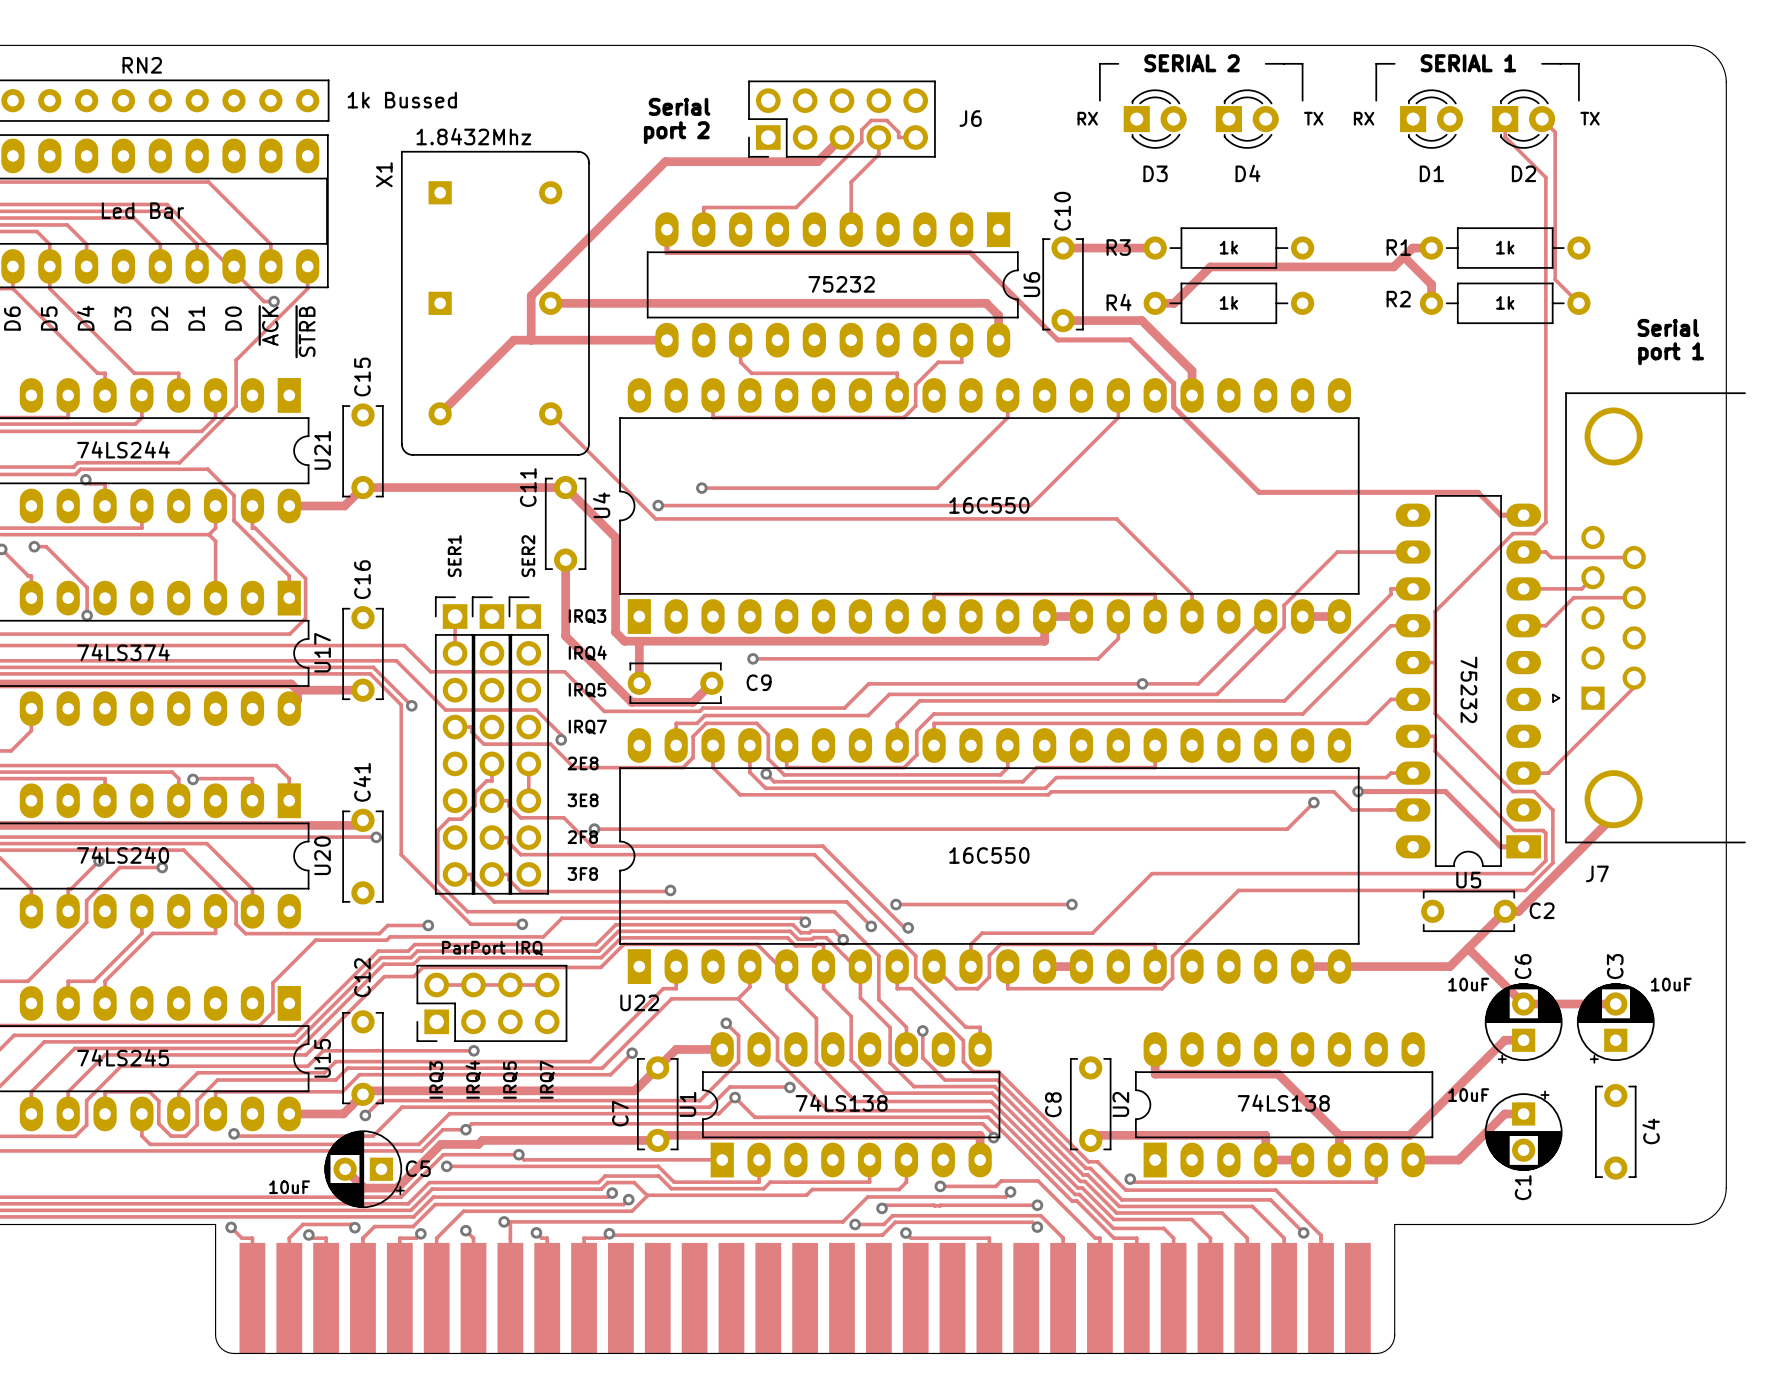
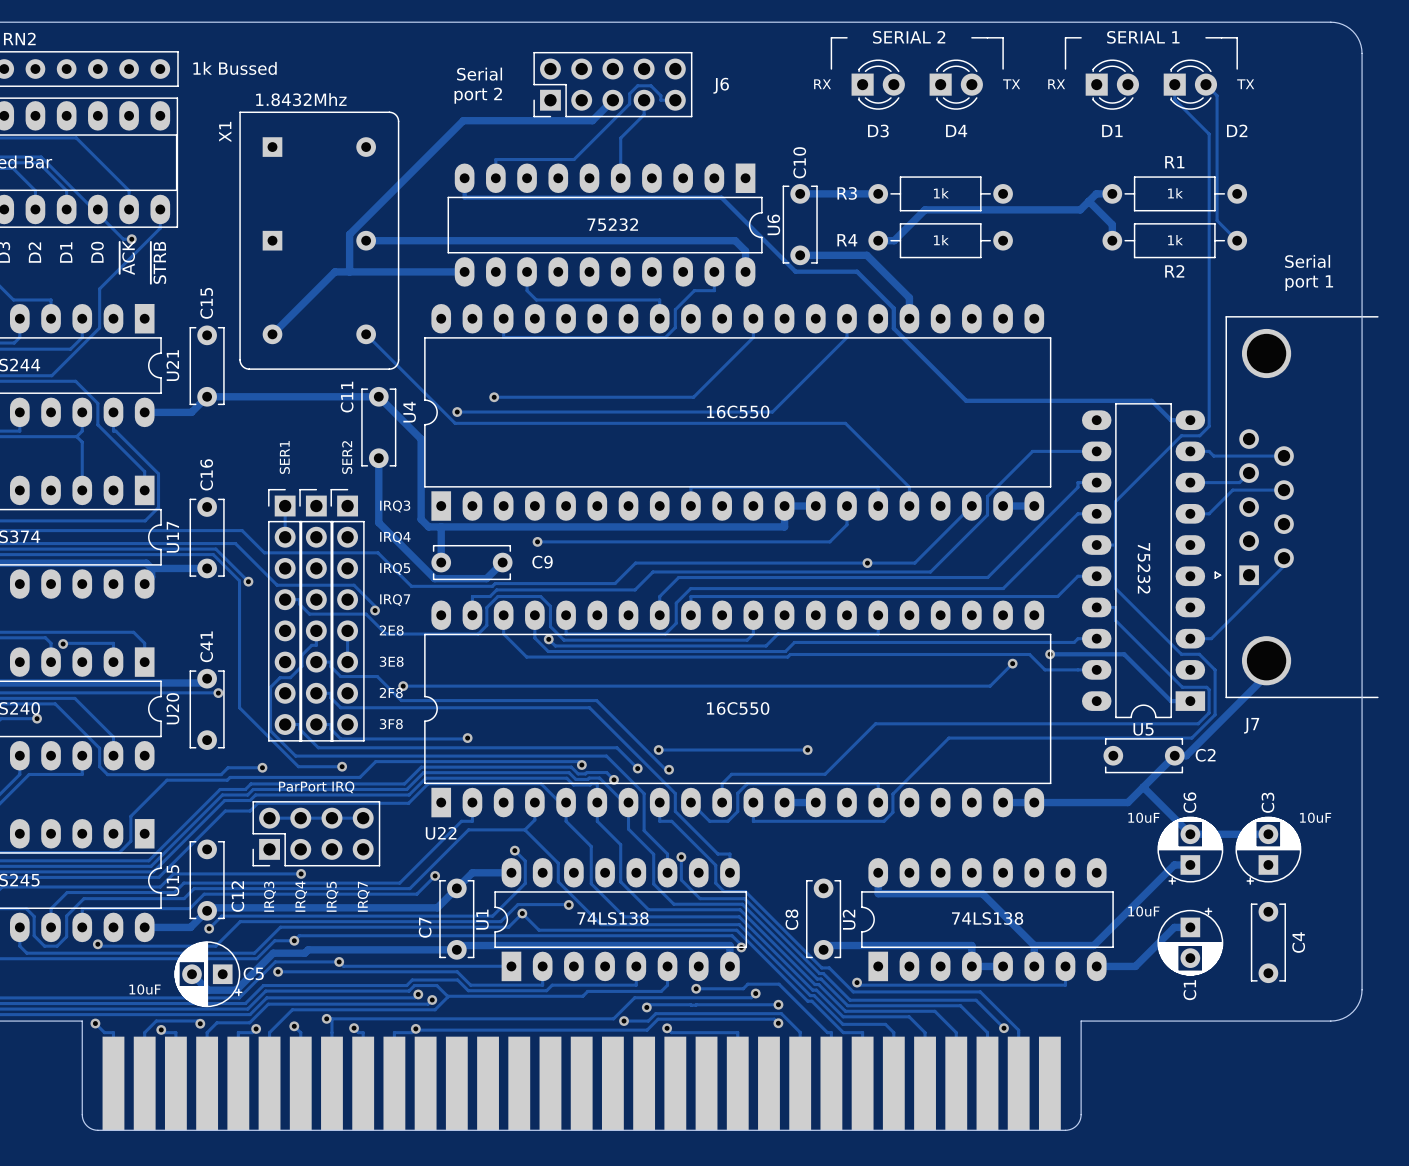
D2 name position: D2 (1524, 173) -> D2 (1237, 130)
R1 name position: R1 (1398, 247) -> R1 (1174, 162)
R2 name position: R2 (1398, 299) -> R2 (1174, 271)
C12 name position: C12 (362, 977) -> C12 (237, 896)

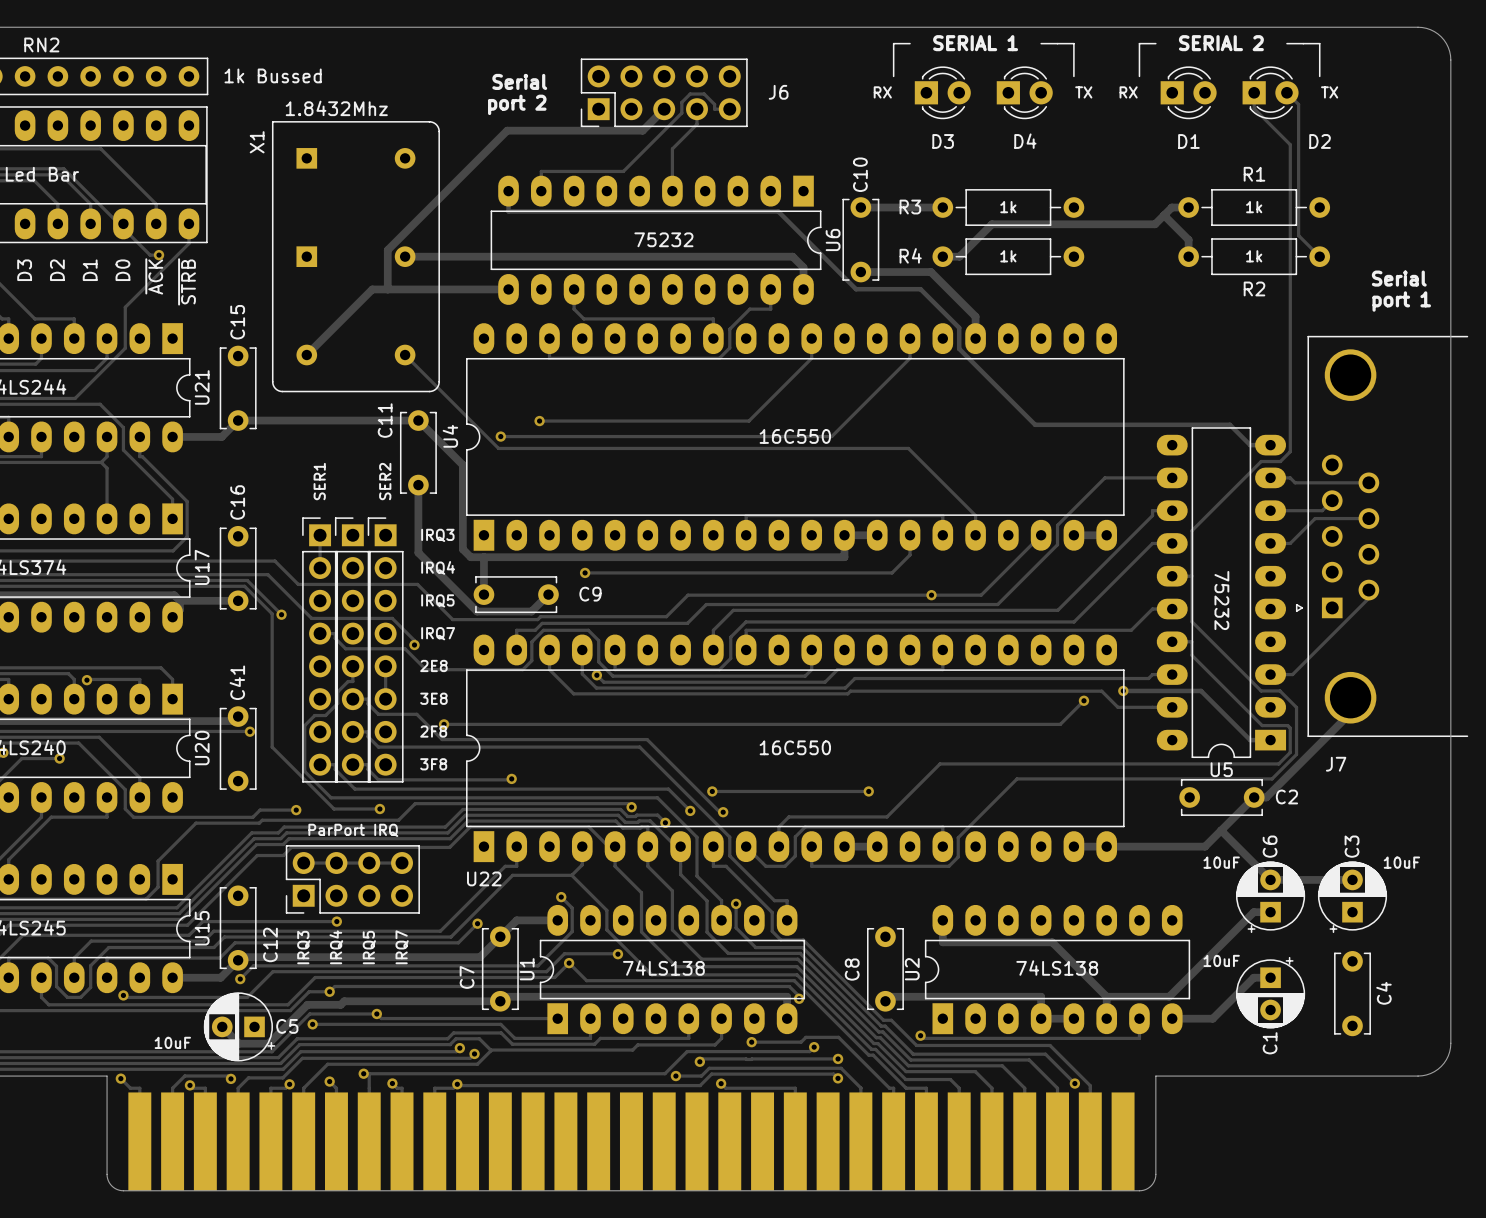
text: SERIAL 2 (909, 37) -> SERIAL 1 (975, 43)
text: SERIAL 1 (1143, 37) -> SERIAL 2 (1221, 43)

